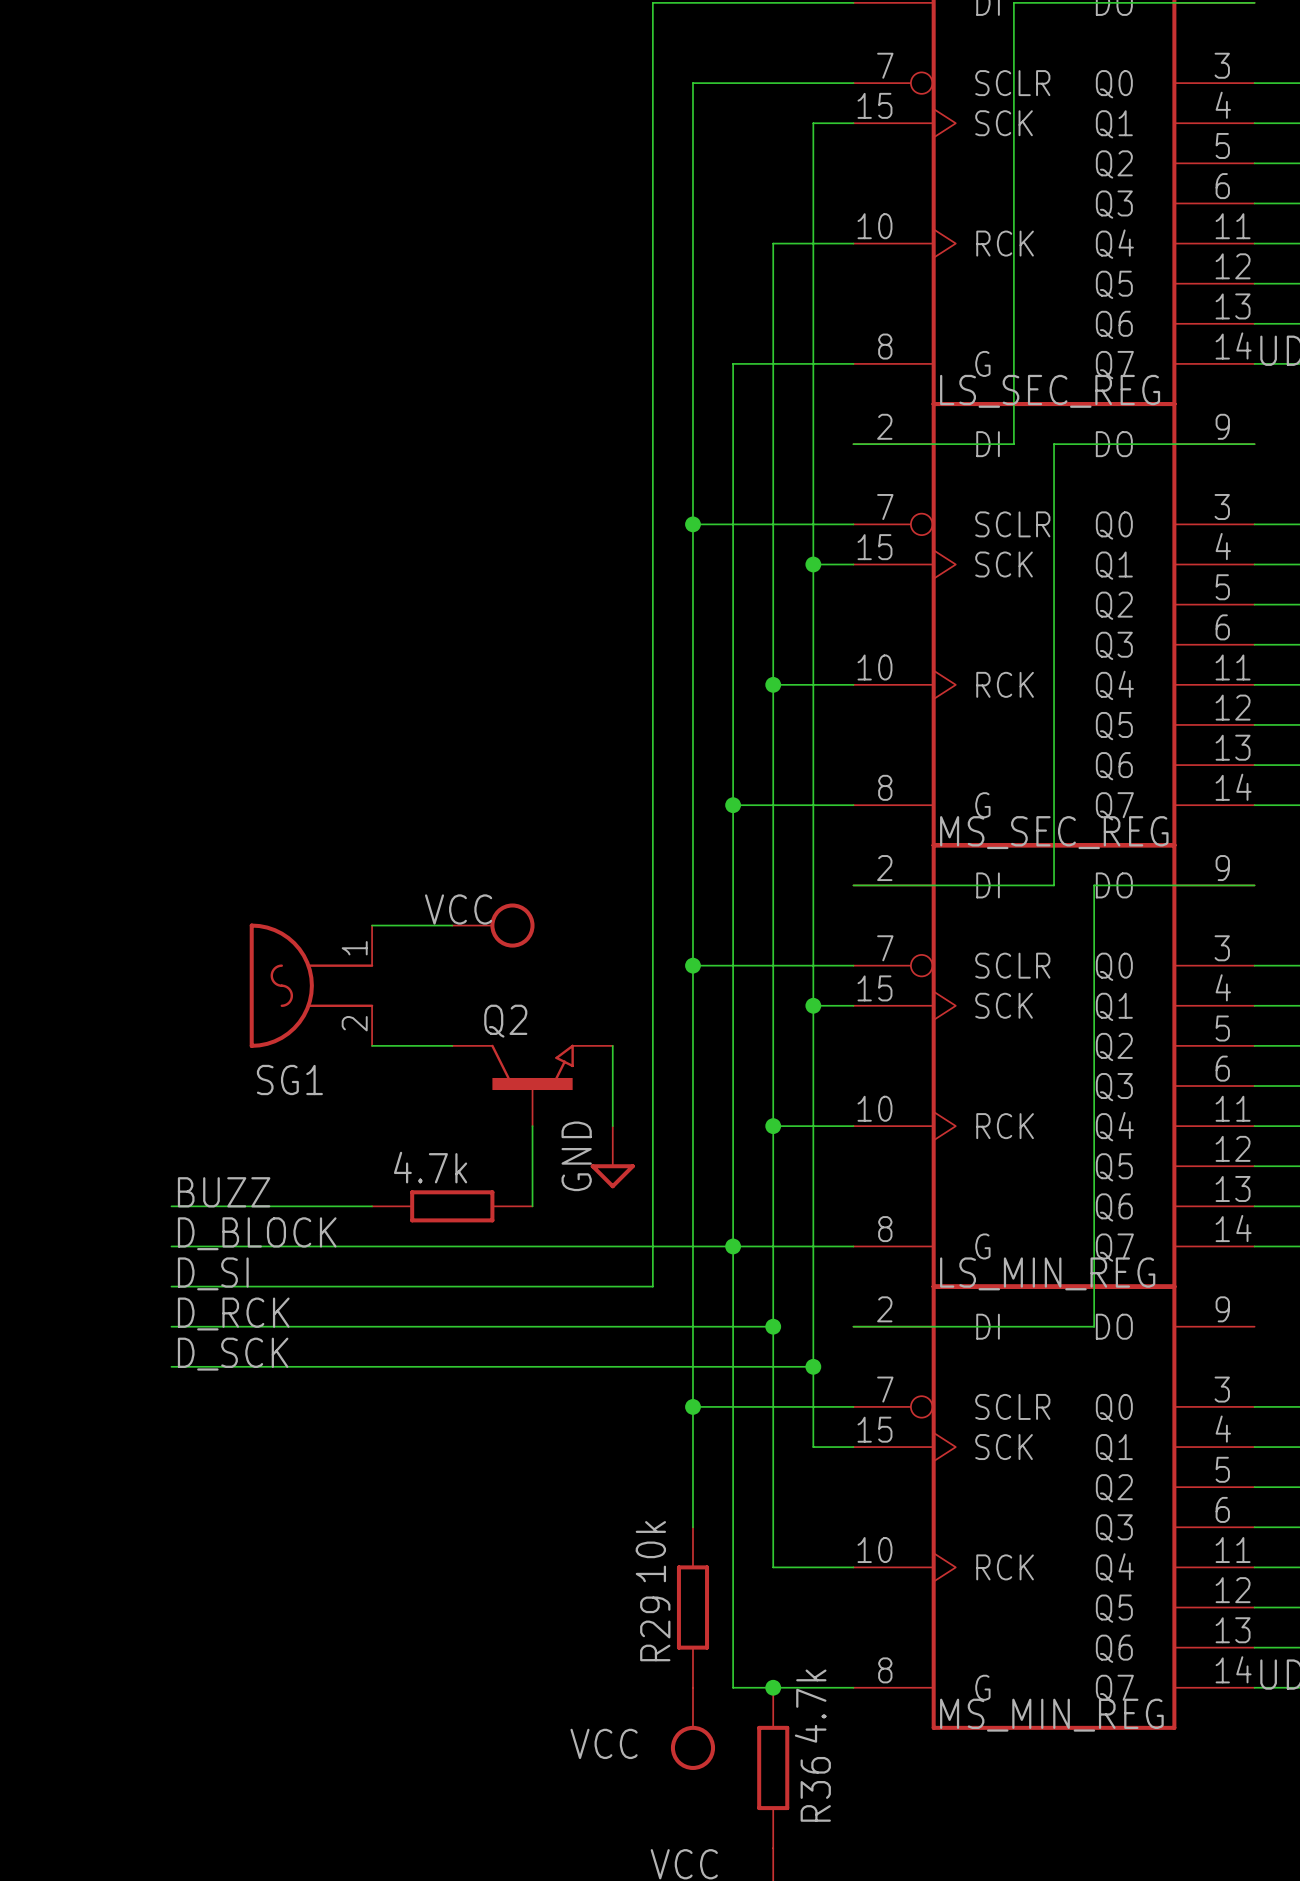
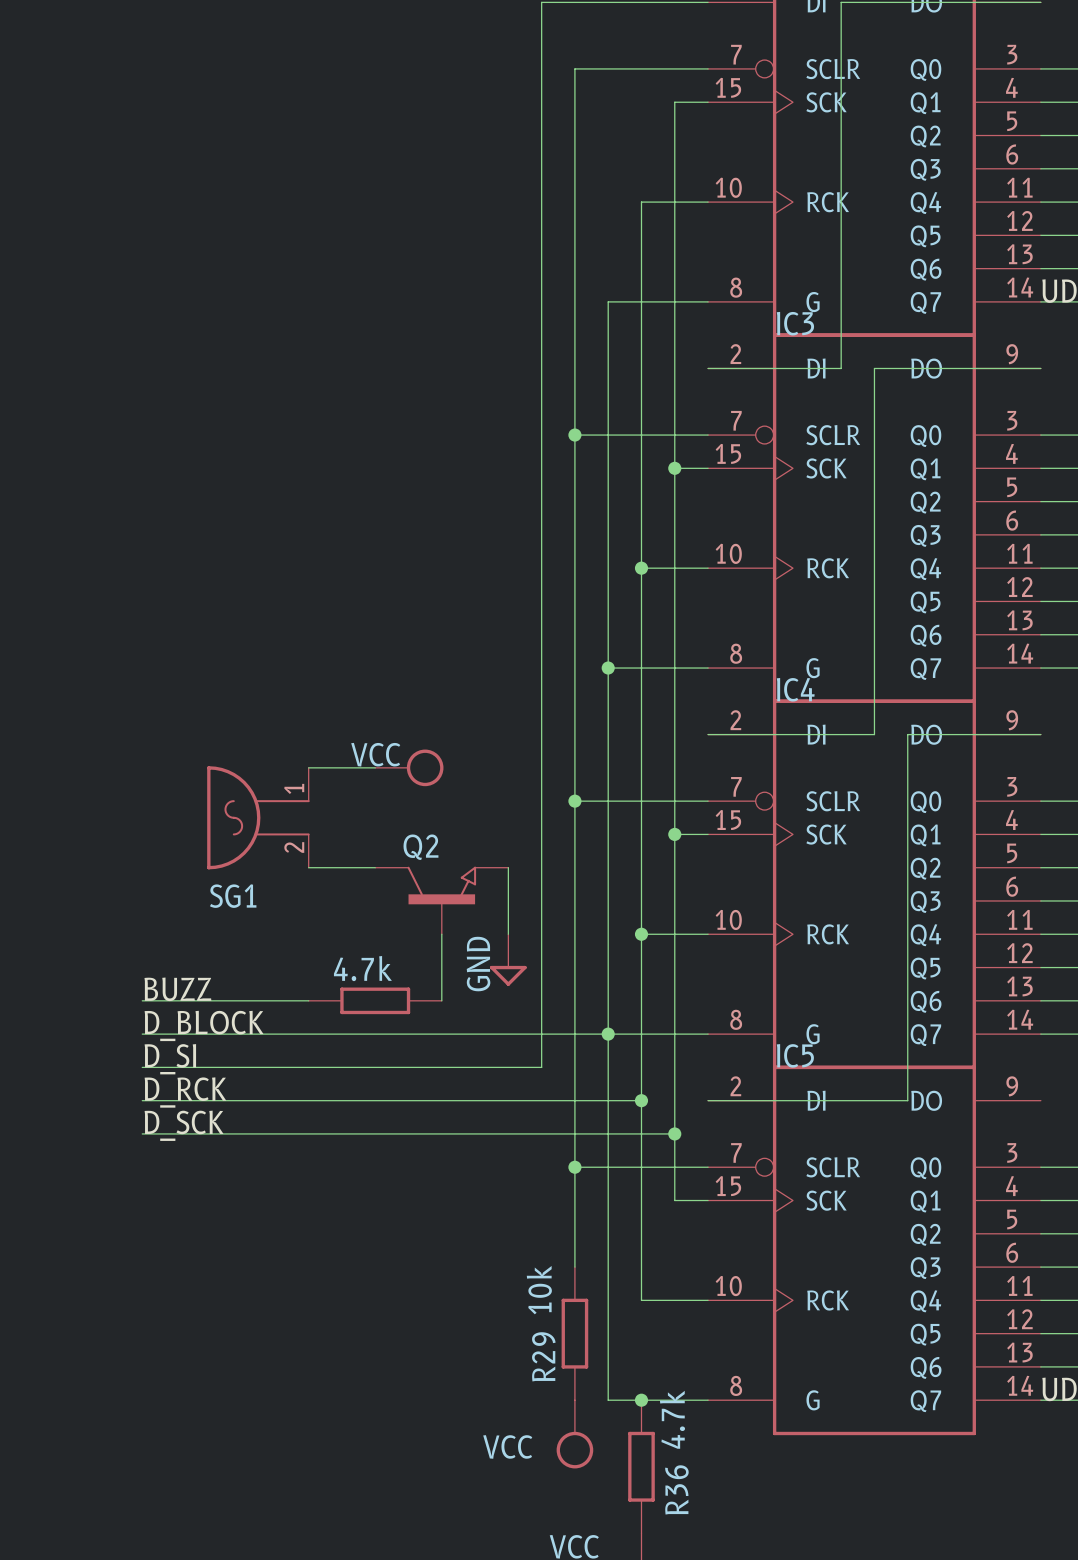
LS_SEC_REG name: LS_SEC_REG (1050, 391) -> none
MS_SEC_REG name: MS_SEC_REG (1054, 832) -> IC3 (795, 323)
LS_MIN_REG name: LS_MIN_REG (1047, 1273) -> IC4 (795, 689)
MS_MIN_REG name: MS_MIN_REG (1051, 1715) -> IC5 (795, 1055)

